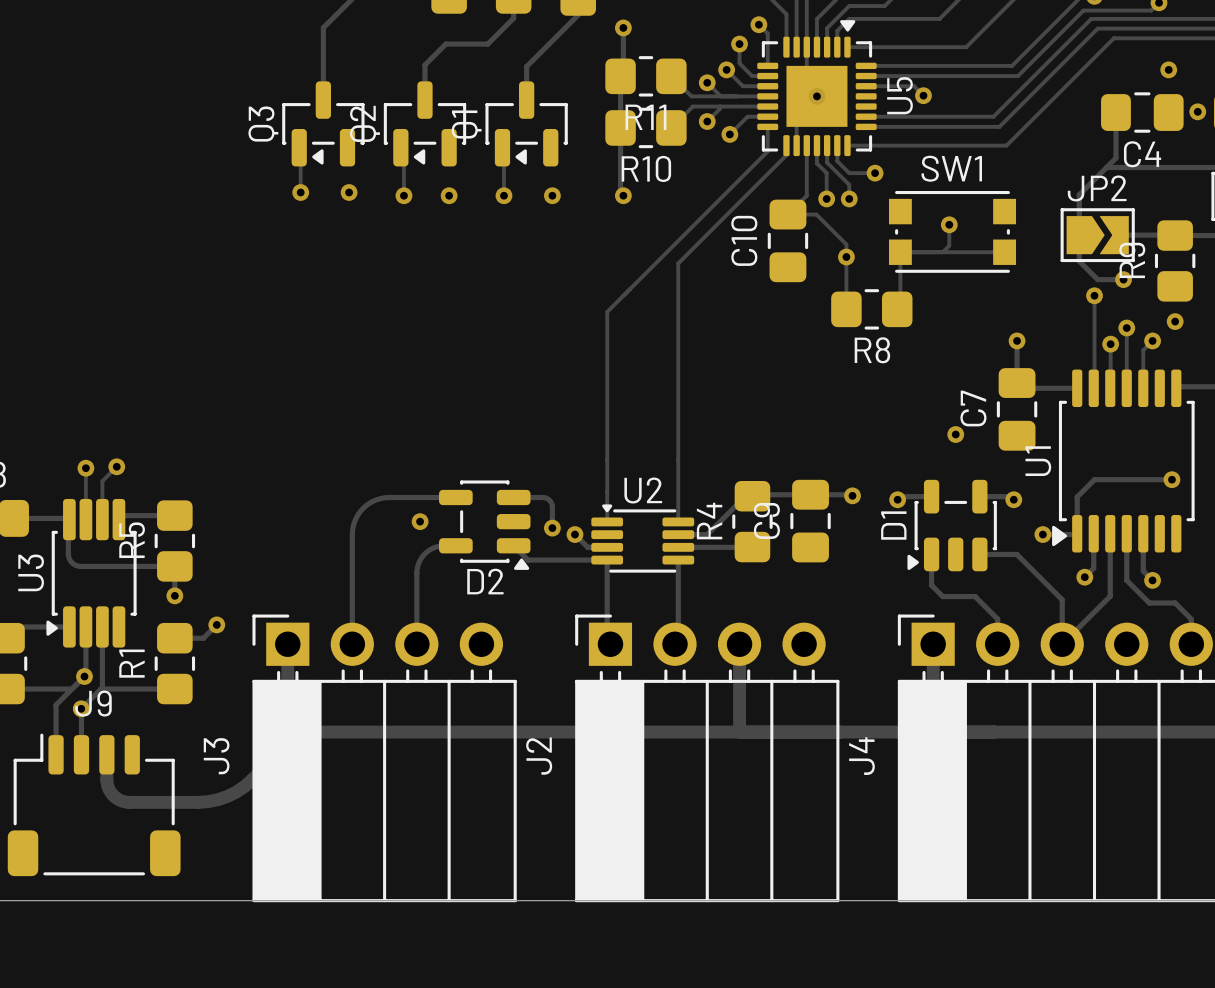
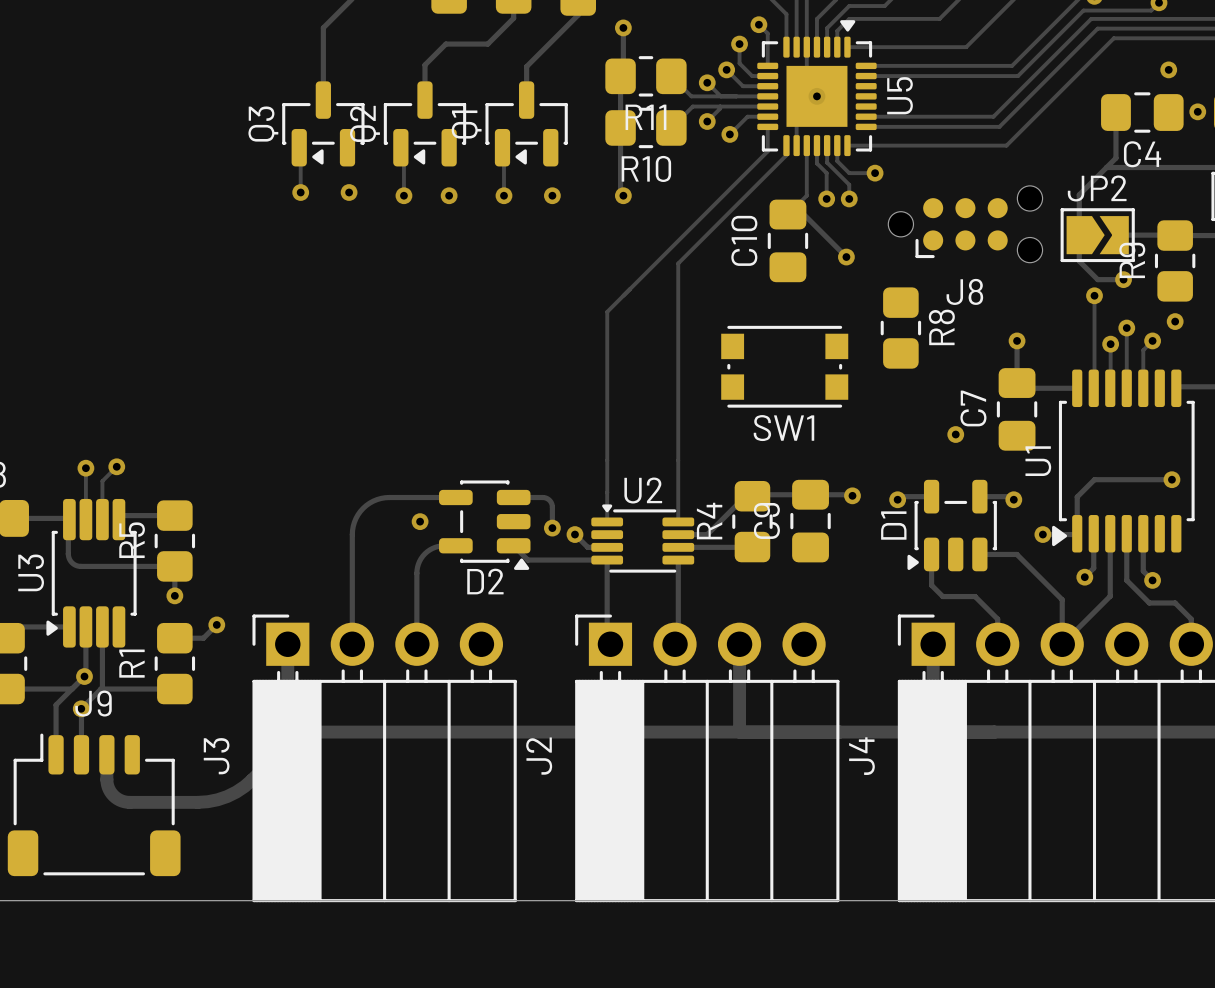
track: (866, 86) (914, 86) (923, 95) -> none
via: (923, 95) -> none
SW1 name position: SW1 (951, 168) -> SW1 (783, 428)
track: (803, 214) (816, 214) (846, 244) (846, 309) -> (803, 214) (846, 257)
track: (949, 224) (949, 245) (942, 252) -> none
via: (949, 224) -> none
J8: none -> (965, 224)
SW1 position: (952, 231) -> (784, 366)
track: (1004, 252) (900, 252) (900, 305) (904, 309) -> none
R8 rotation: 0° (871, 309) -> 90° clockwise (900, 328)
R8 name position: R8 (872, 350) -> R8 (941, 327)

